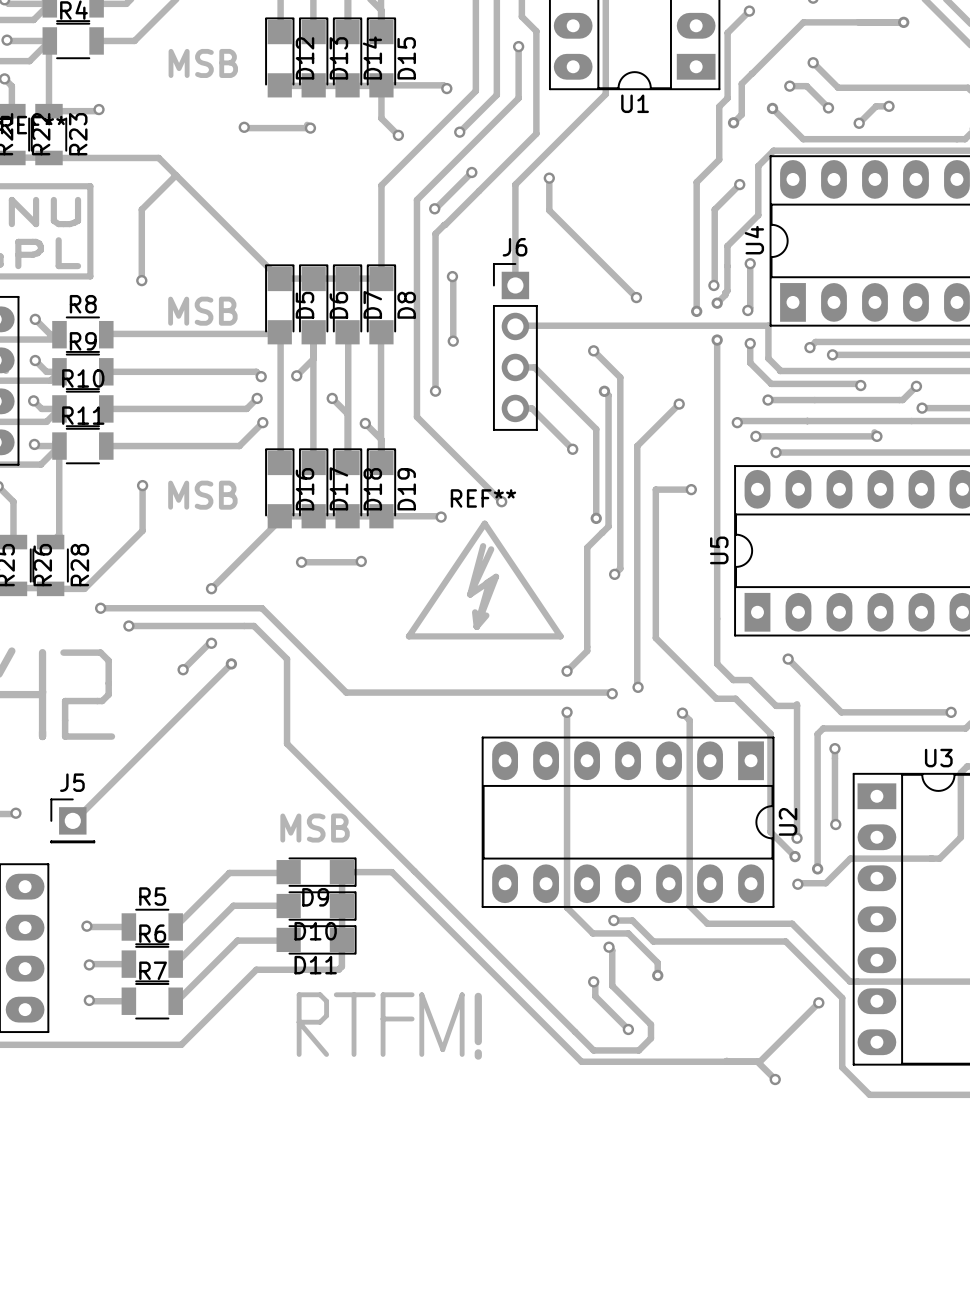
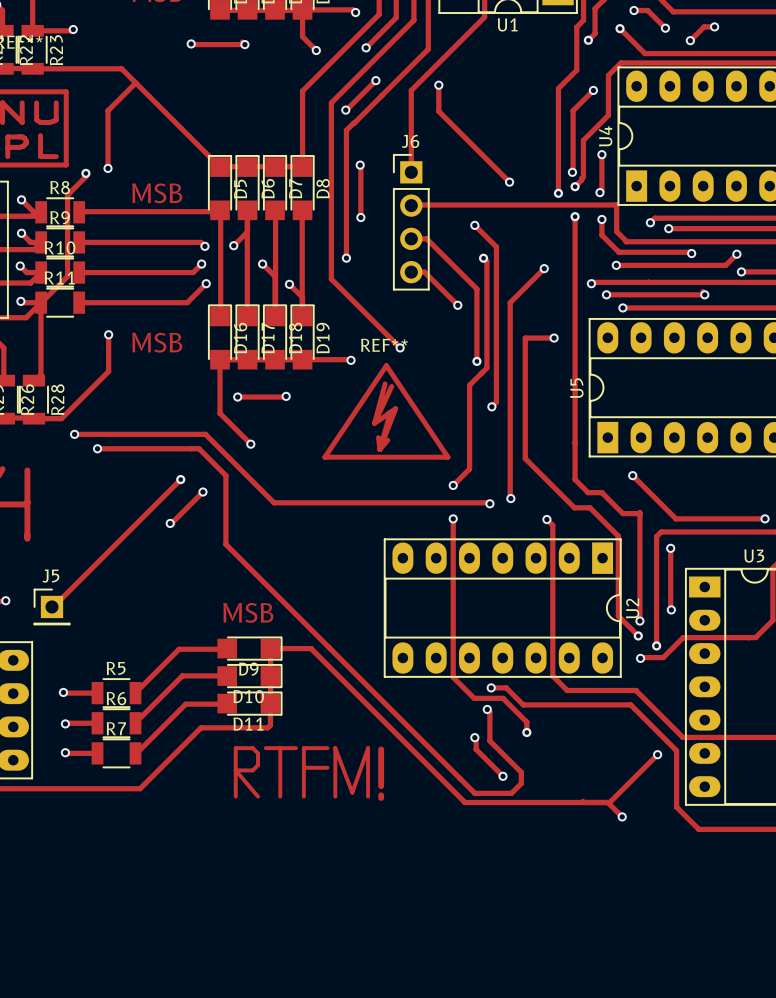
track: none -> (85, 173) (85, 176) (67, 195) (67, 276) (40, 303)
via: none -> (85, 173)
track: (279, 520) (211, 588) -> (220, 363) (220, 413) (250, 444)
via: (211, 588) -> none
via: none -> (250, 444)
track: (211, 643) (183, 669) -> none
via: (211, 643) -> none
track: (63, 652) (100, 652) (108, 660) (108, 694) (102, 701) (65, 701) (65, 736) (111, 736) -> none
via: (183, 669) -> none
track: none -> (202, 492) (170, 523)
via: none -> (202, 492)
via: none -> (170, 523)

